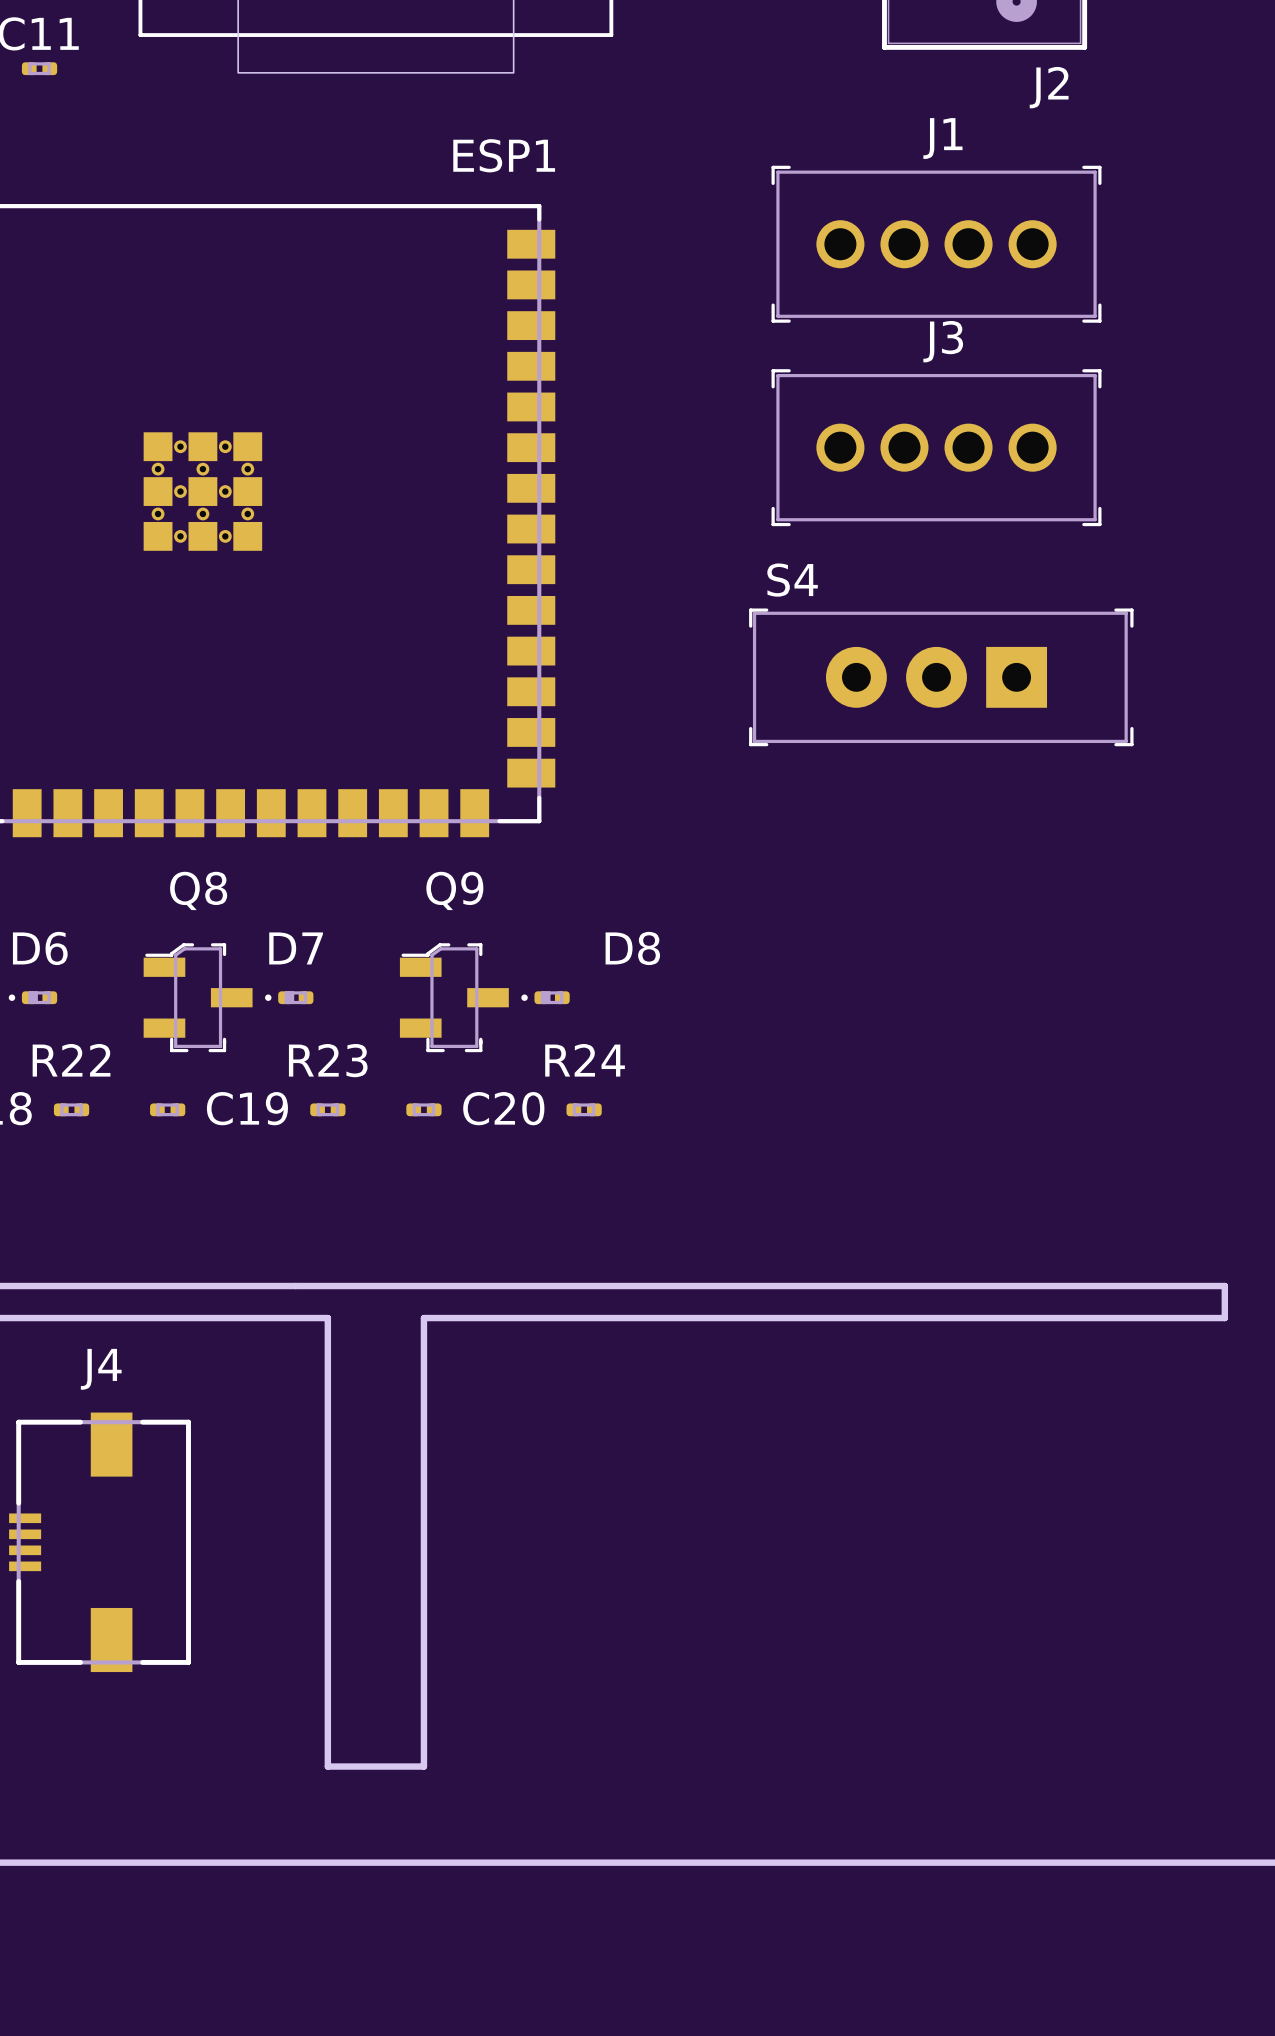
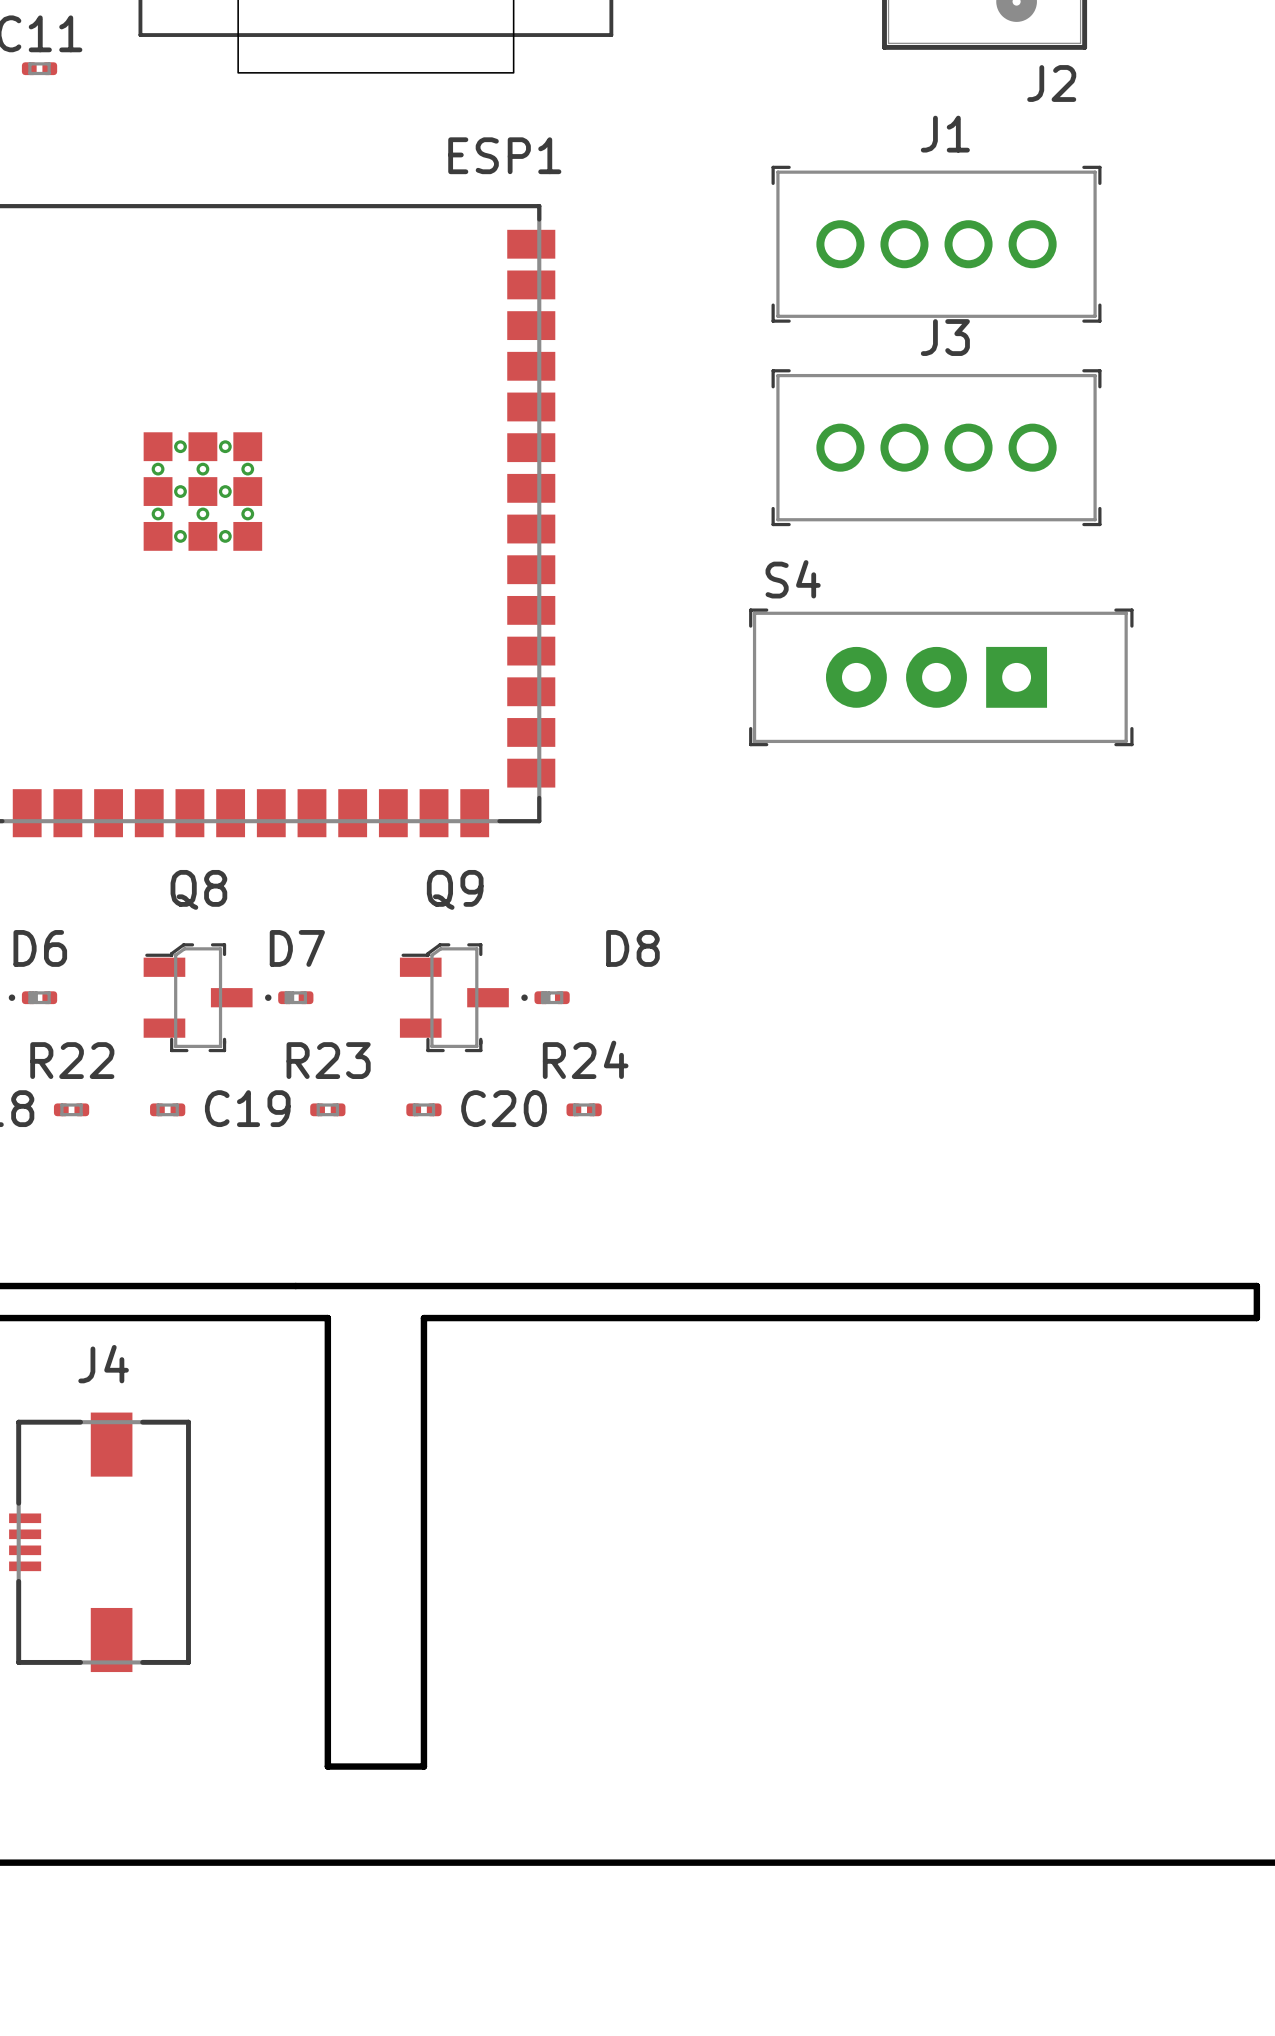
board edge: (1224, 1286) (1224, 1318) -> (1224, 1286) (1256, 1286) (1256, 1318) (1224, 1318)

